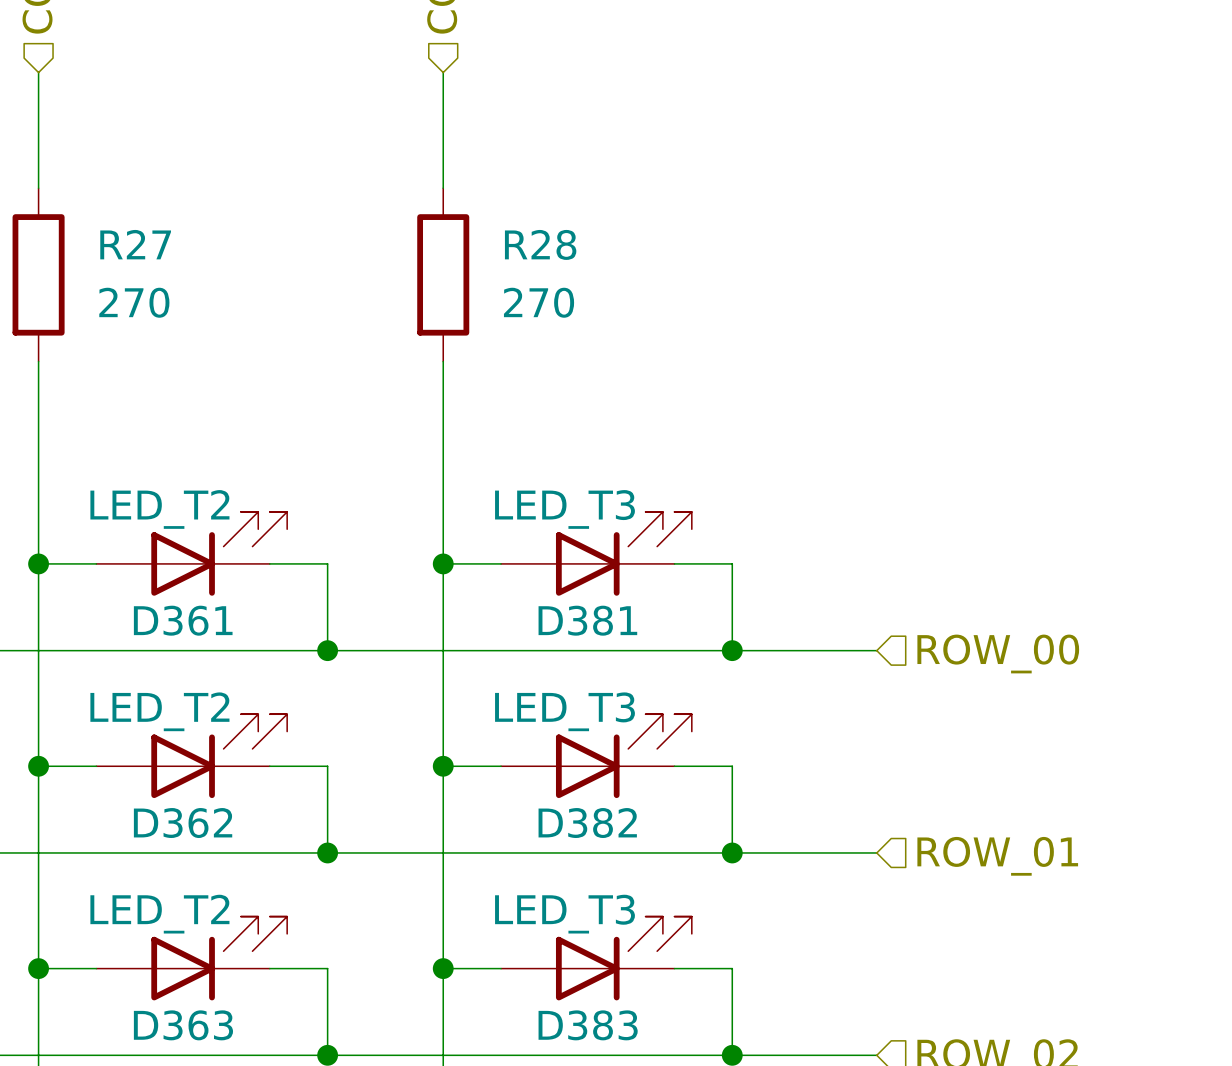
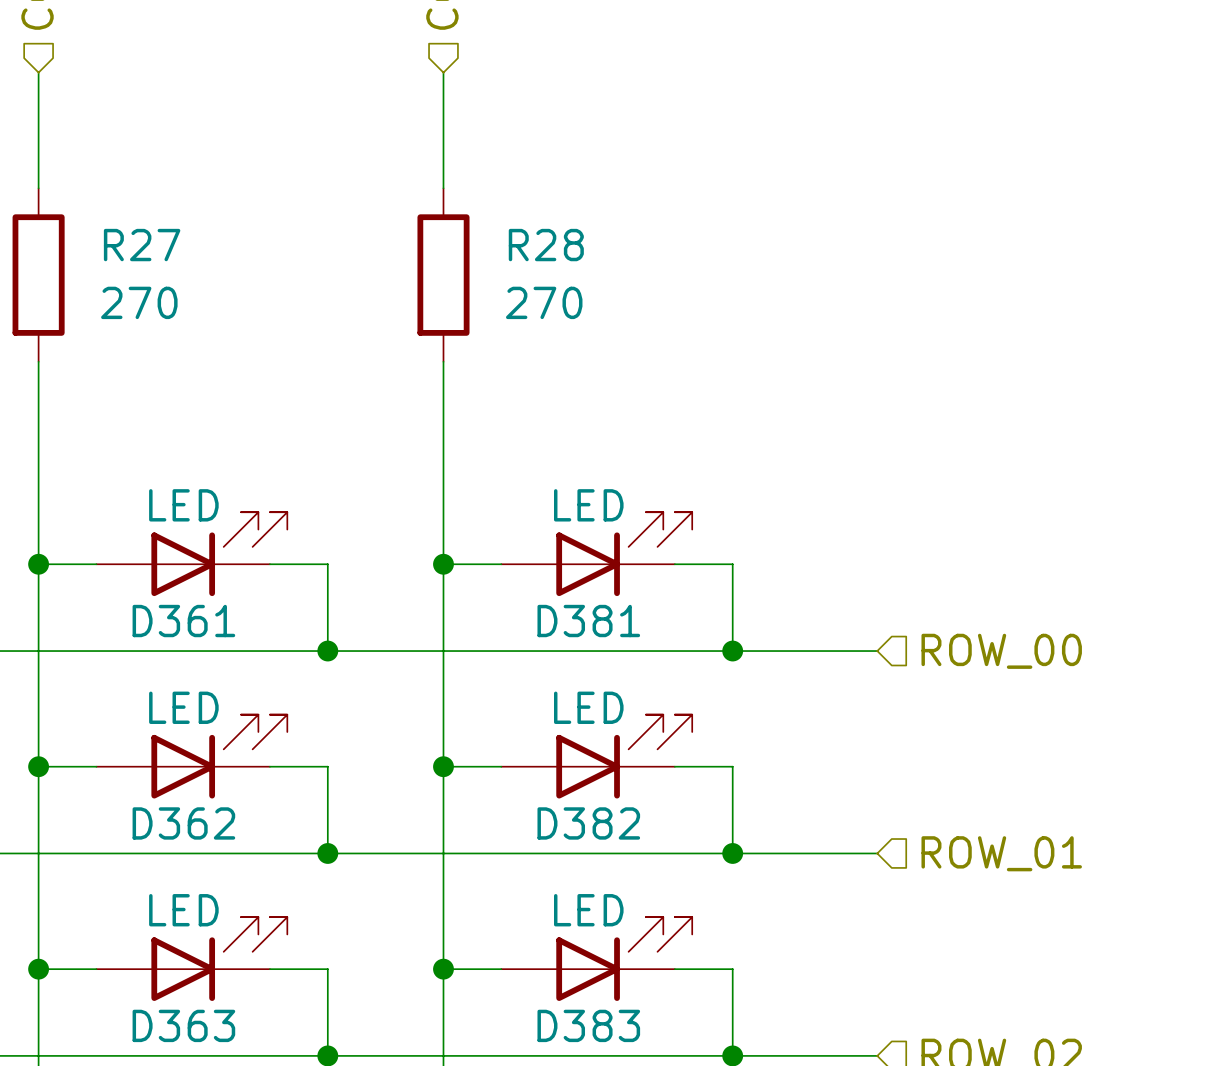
D361 value: LED_T2 (159, 509) -> LED (183, 505)
D381 value: LED_T3 (564, 509) -> LED (588, 505)
D362 value: LED_T2 (159, 711) -> LED (183, 707)
D382 value: LED_T3 (564, 711) -> LED (588, 707)
D363 value: LED_T2 (159, 914) -> LED (183, 910)
D383 value: LED_T3 (564, 914) -> LED (588, 910)

